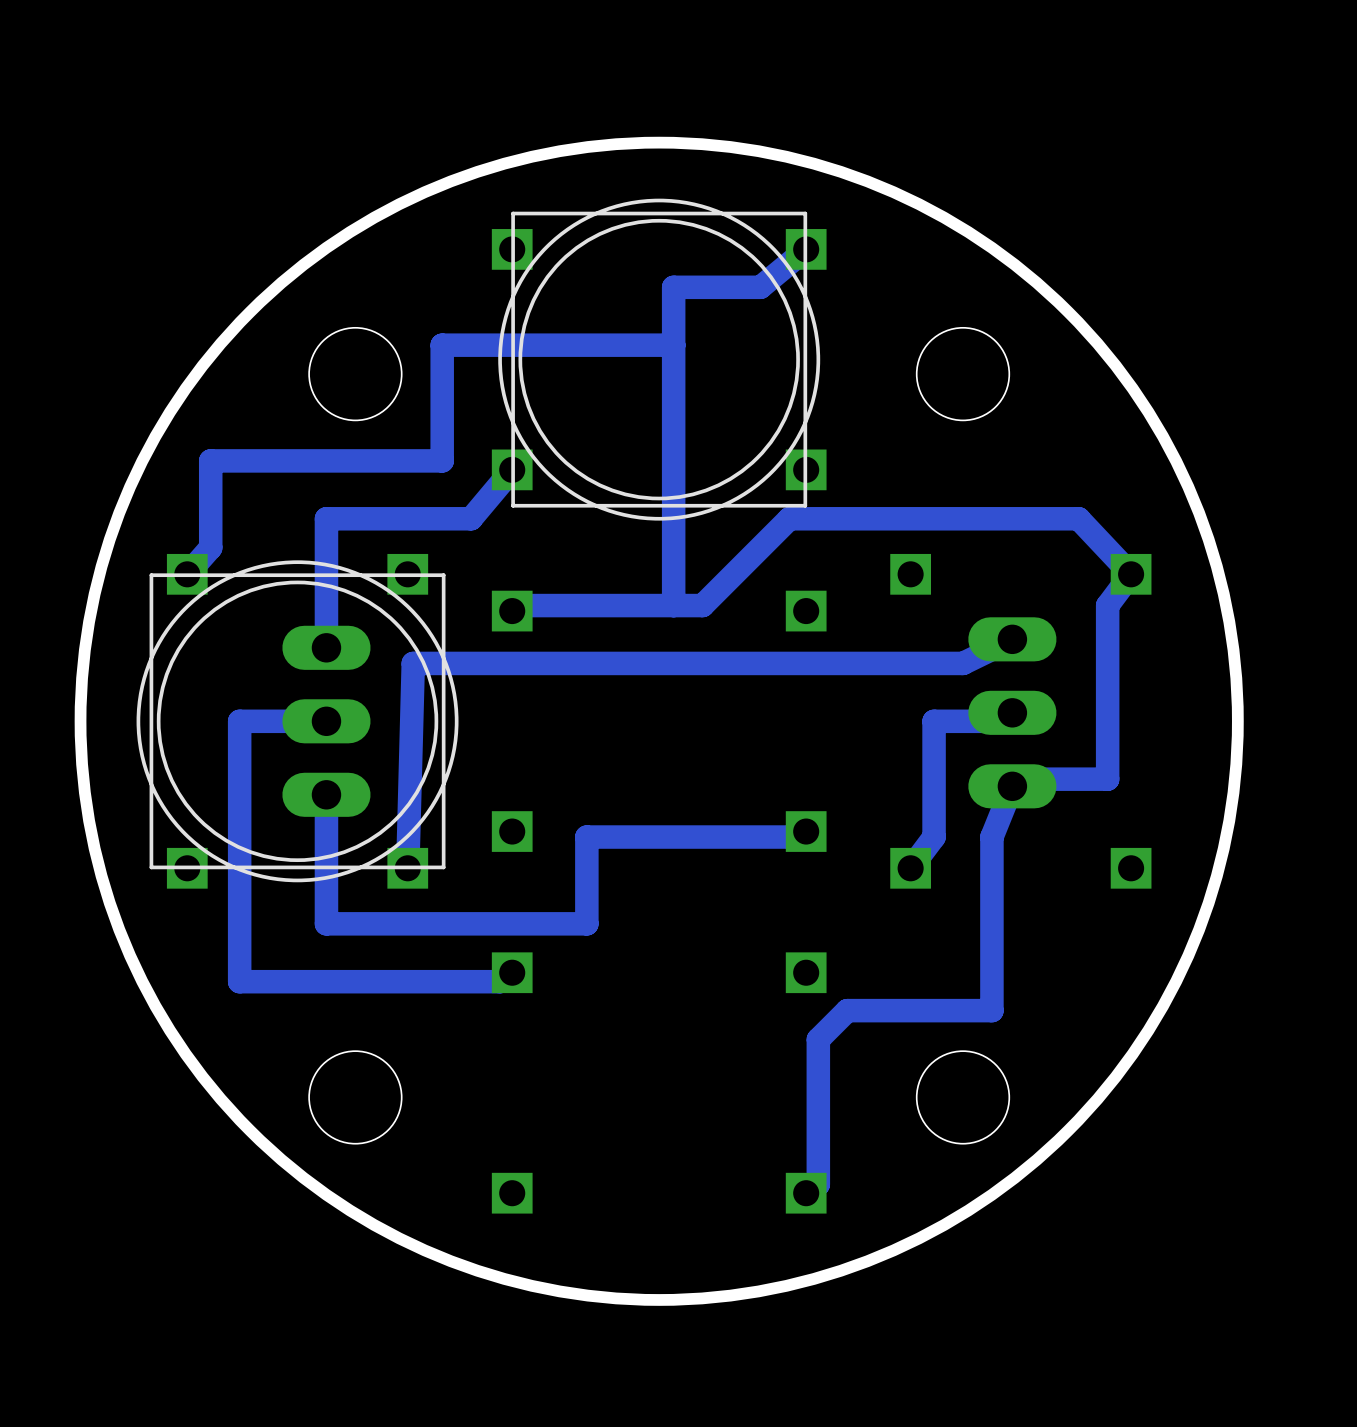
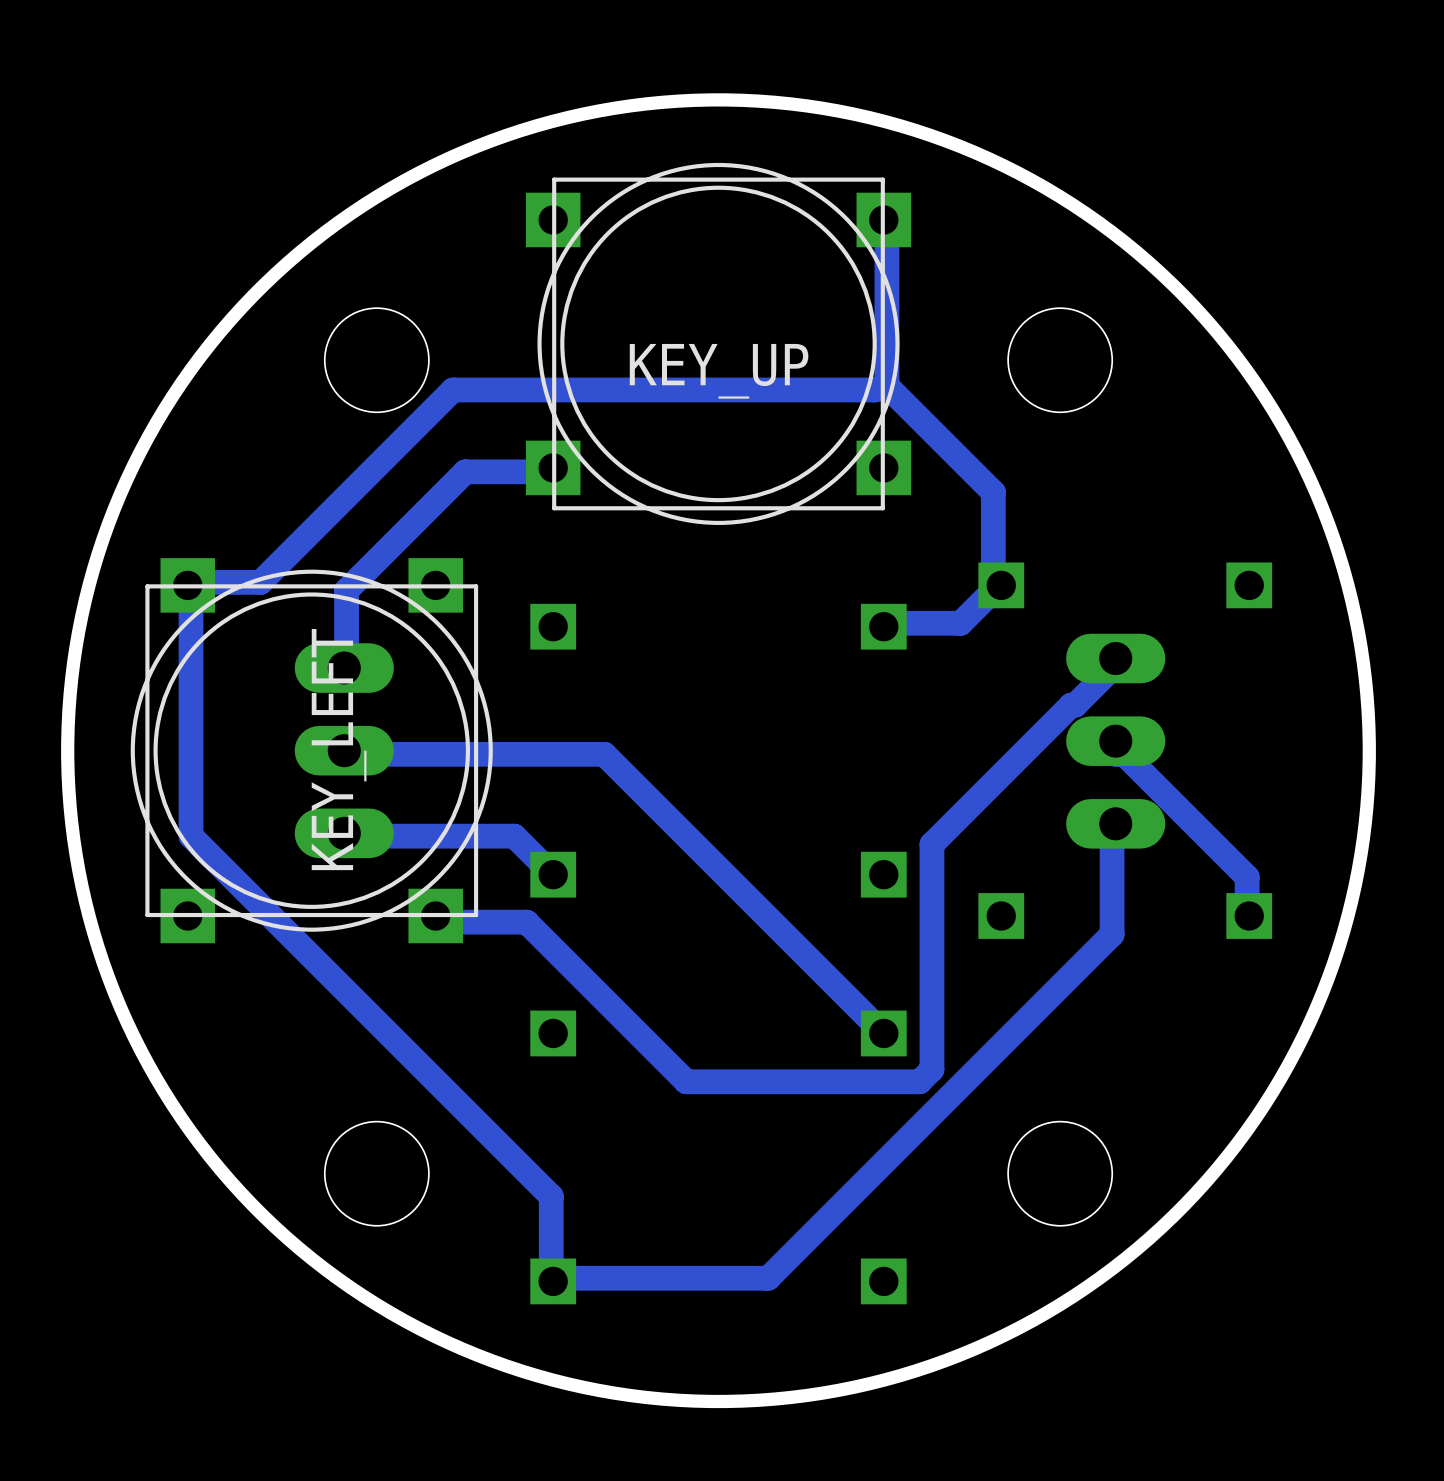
bottom track: (806, 249) (760, 287) (673, 287) (673, 605) -> (883, 219) (886, 222) (886, 385)
bottom track: (673, 345) (442, 345) (442, 460) (210, 460) (210, 547) (187, 574) -> none
part: (659, 359) -> none
KEY_UP: none -> (718, 343)
bottom track: none -> (886, 385) (993, 492) (993, 574) (1001, 585) (997, 586) (960, 623) (886, 623) (883, 626)
bottom track: none -> (886, 385) (874, 389) (453, 389) (260, 582) (203, 582) (187, 585) (191, 586) (191, 836) (551, 1196) (551, 1265) (553, 1281) (555, 1278) (768, 1278) (1112, 934) (1112, 836) (1115, 833)
bottom track: (512, 469) (471, 518) (326, 518) (326, 647) -> (553, 467) (551, 471) (465, 471) (346, 590) (346, 664) (344, 668)
bottom track: (512, 611) (529, 605) (702, 605) (789, 518) (1078, 518) (1131, 574) (1107, 605) (1107, 779) (1020, 779) (1012, 786) (991, 837) (991, 1010) (847, 1010) (818, 1039) (818, 1184) (806, 1193) -> none
bottom track: (1012, 639) (963, 663) (413, 663) (407, 868) -> (1115, 668) (1112, 668) (1075, 705) (1071, 705) (931, 844) (931, 1069) (919, 1081) (686, 1081) (526, 922) (440, 922) (435, 916)
bottom track: (1012, 712) (991, 721) (934, 721) (934, 837) (910, 868) -> none
part: (297, 721) -> none
KEY_LEFT: none -> (311, 750)
bottom track: (326, 721) (239, 721) (239, 981) (500, 981) (512, 972) -> (344, 750) (346, 754) (604, 754) (883, 1033)
bottom track: none -> (1115, 750) (1116, 754) (1124, 754) (1247, 877) (1247, 913) (1249, 916)
bottom track: (326, 794) (326, 923) (586, 923) (586, 837) (789, 837) (806, 831) -> (344, 833) (346, 836) (514, 836) (553, 874)

